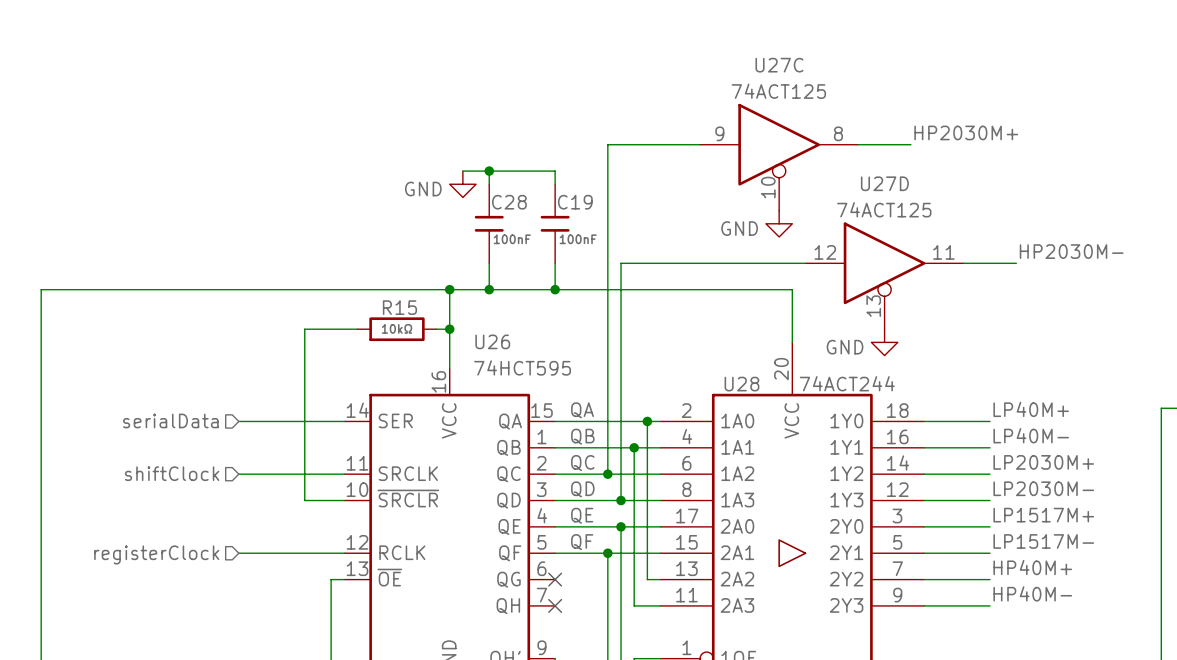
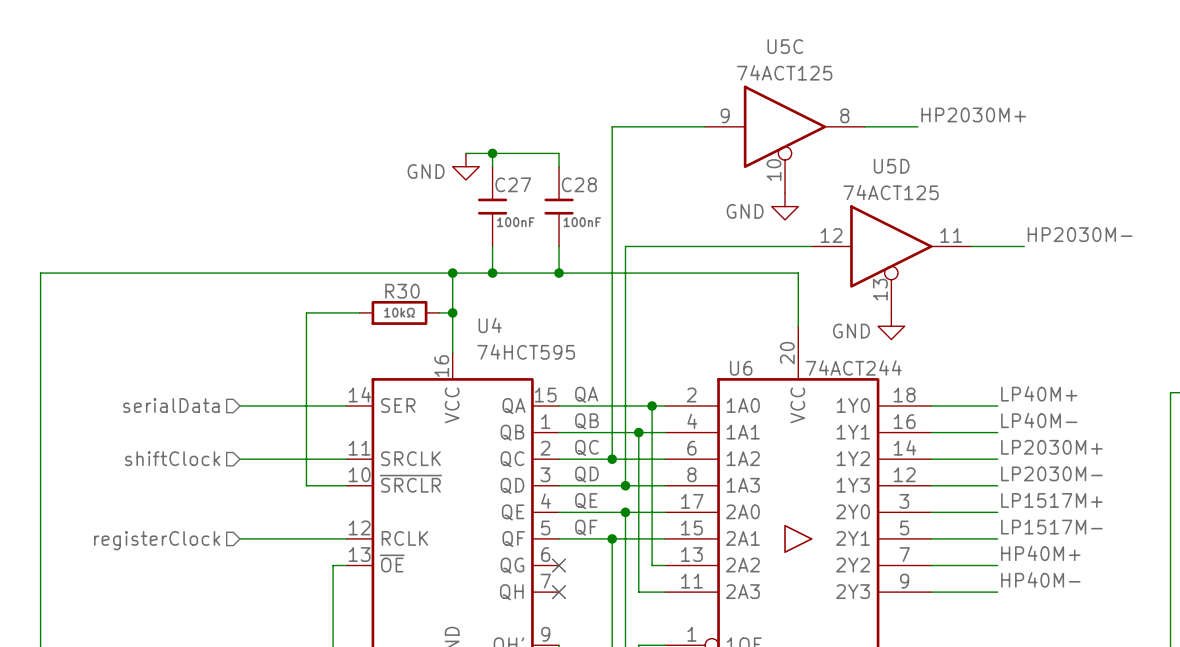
U27C name: U27C (779, 65) -> U5C (785, 46)
U27D name: U27D (884, 183) -> U5D (891, 166)
C28 name: C28 (509, 202) -> C27 (513, 184)
C19 name: C19 (575, 202) -> C28 (579, 184)
R15 name: R15 (399, 307) -> R30 (402, 291)
U26 name: U26 (492, 341) -> U4 (490, 325)
U28 name: U28 (741, 384) -> U6 (741, 368)

